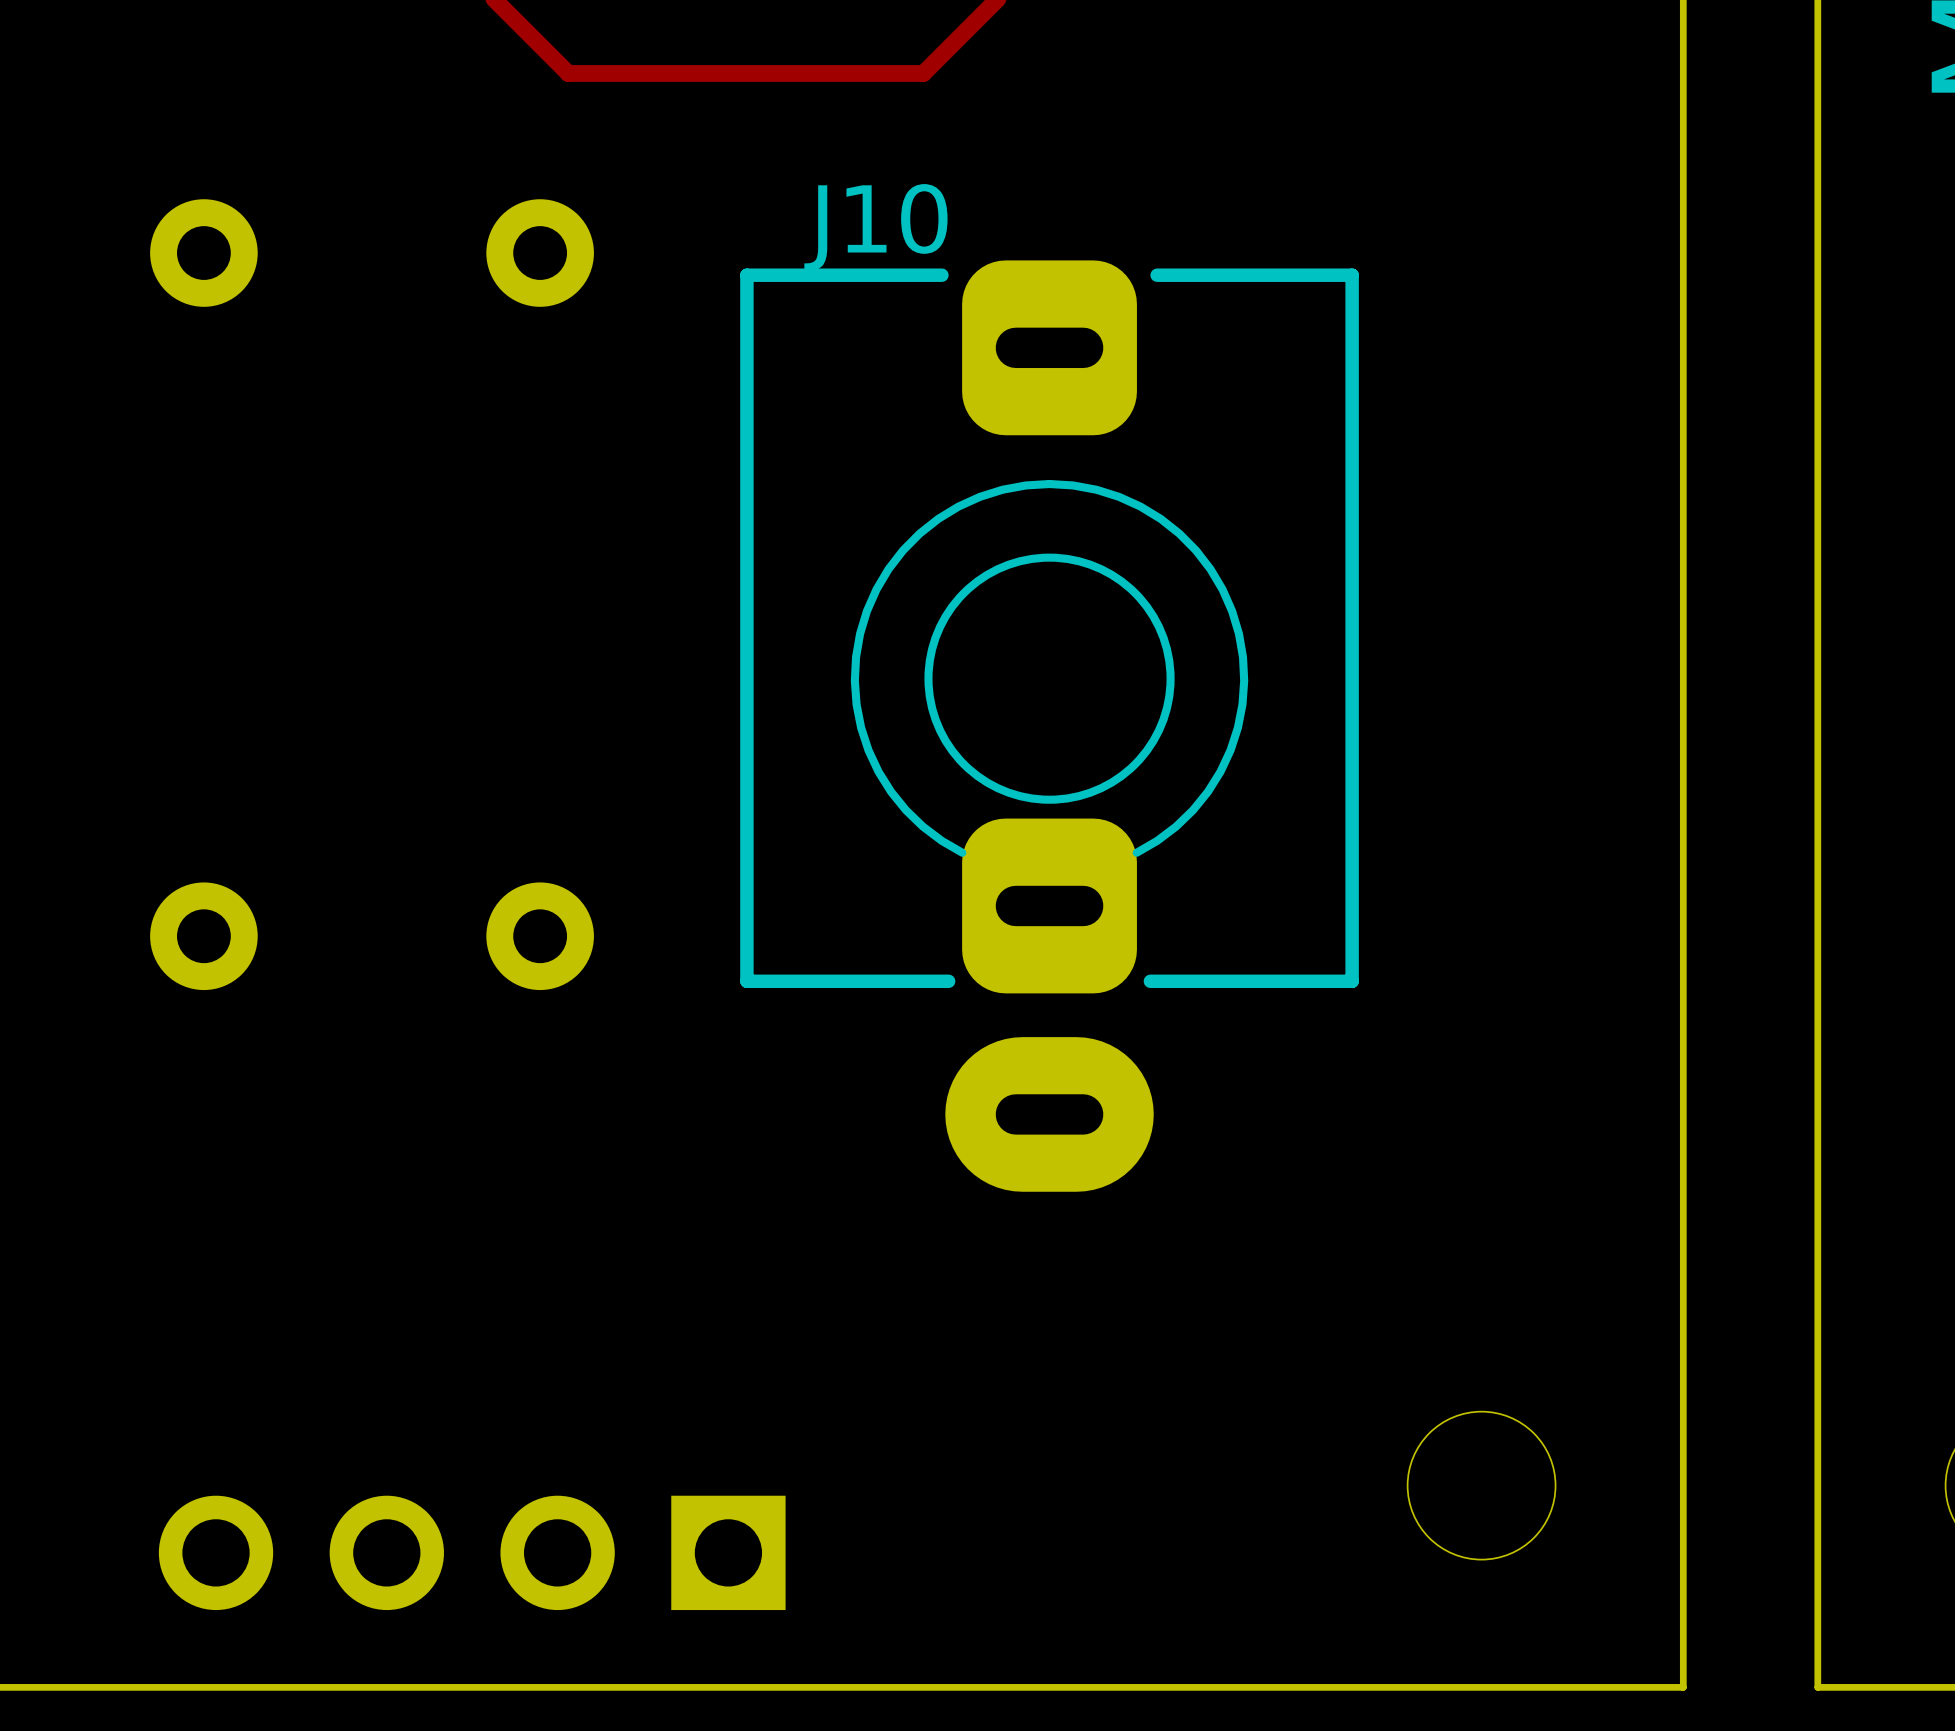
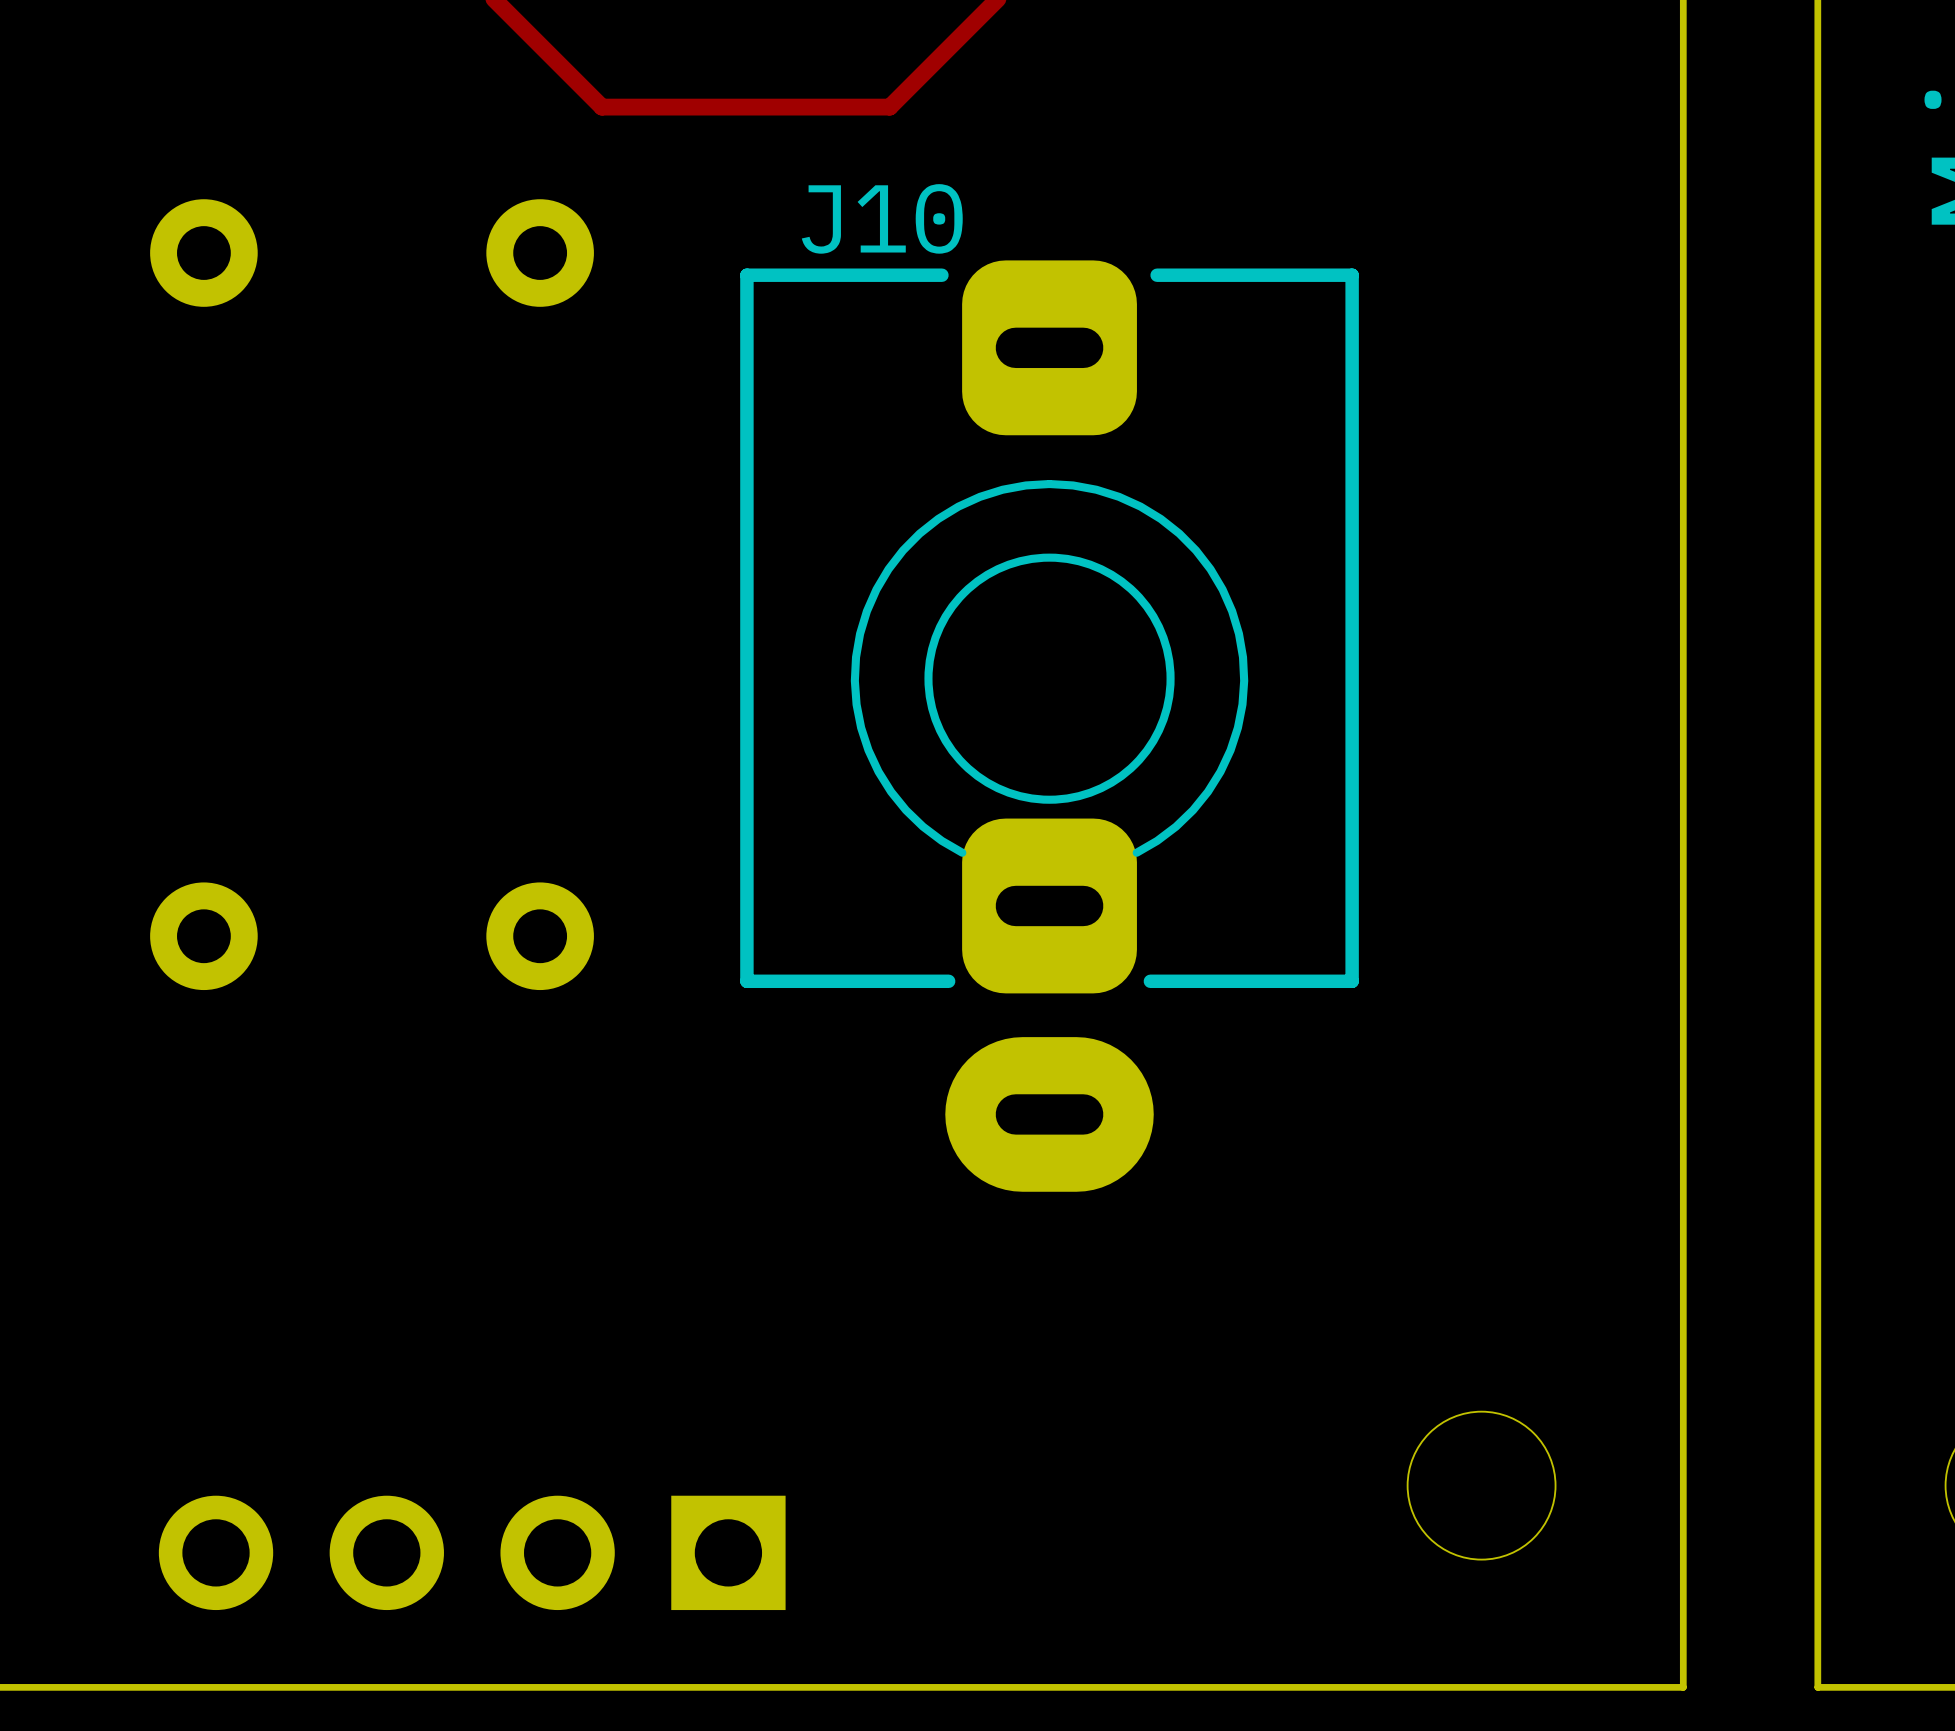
track: (568, 73) (923, 73) -> (568, 73) (602, 107) (889, 107) (923, 73)

